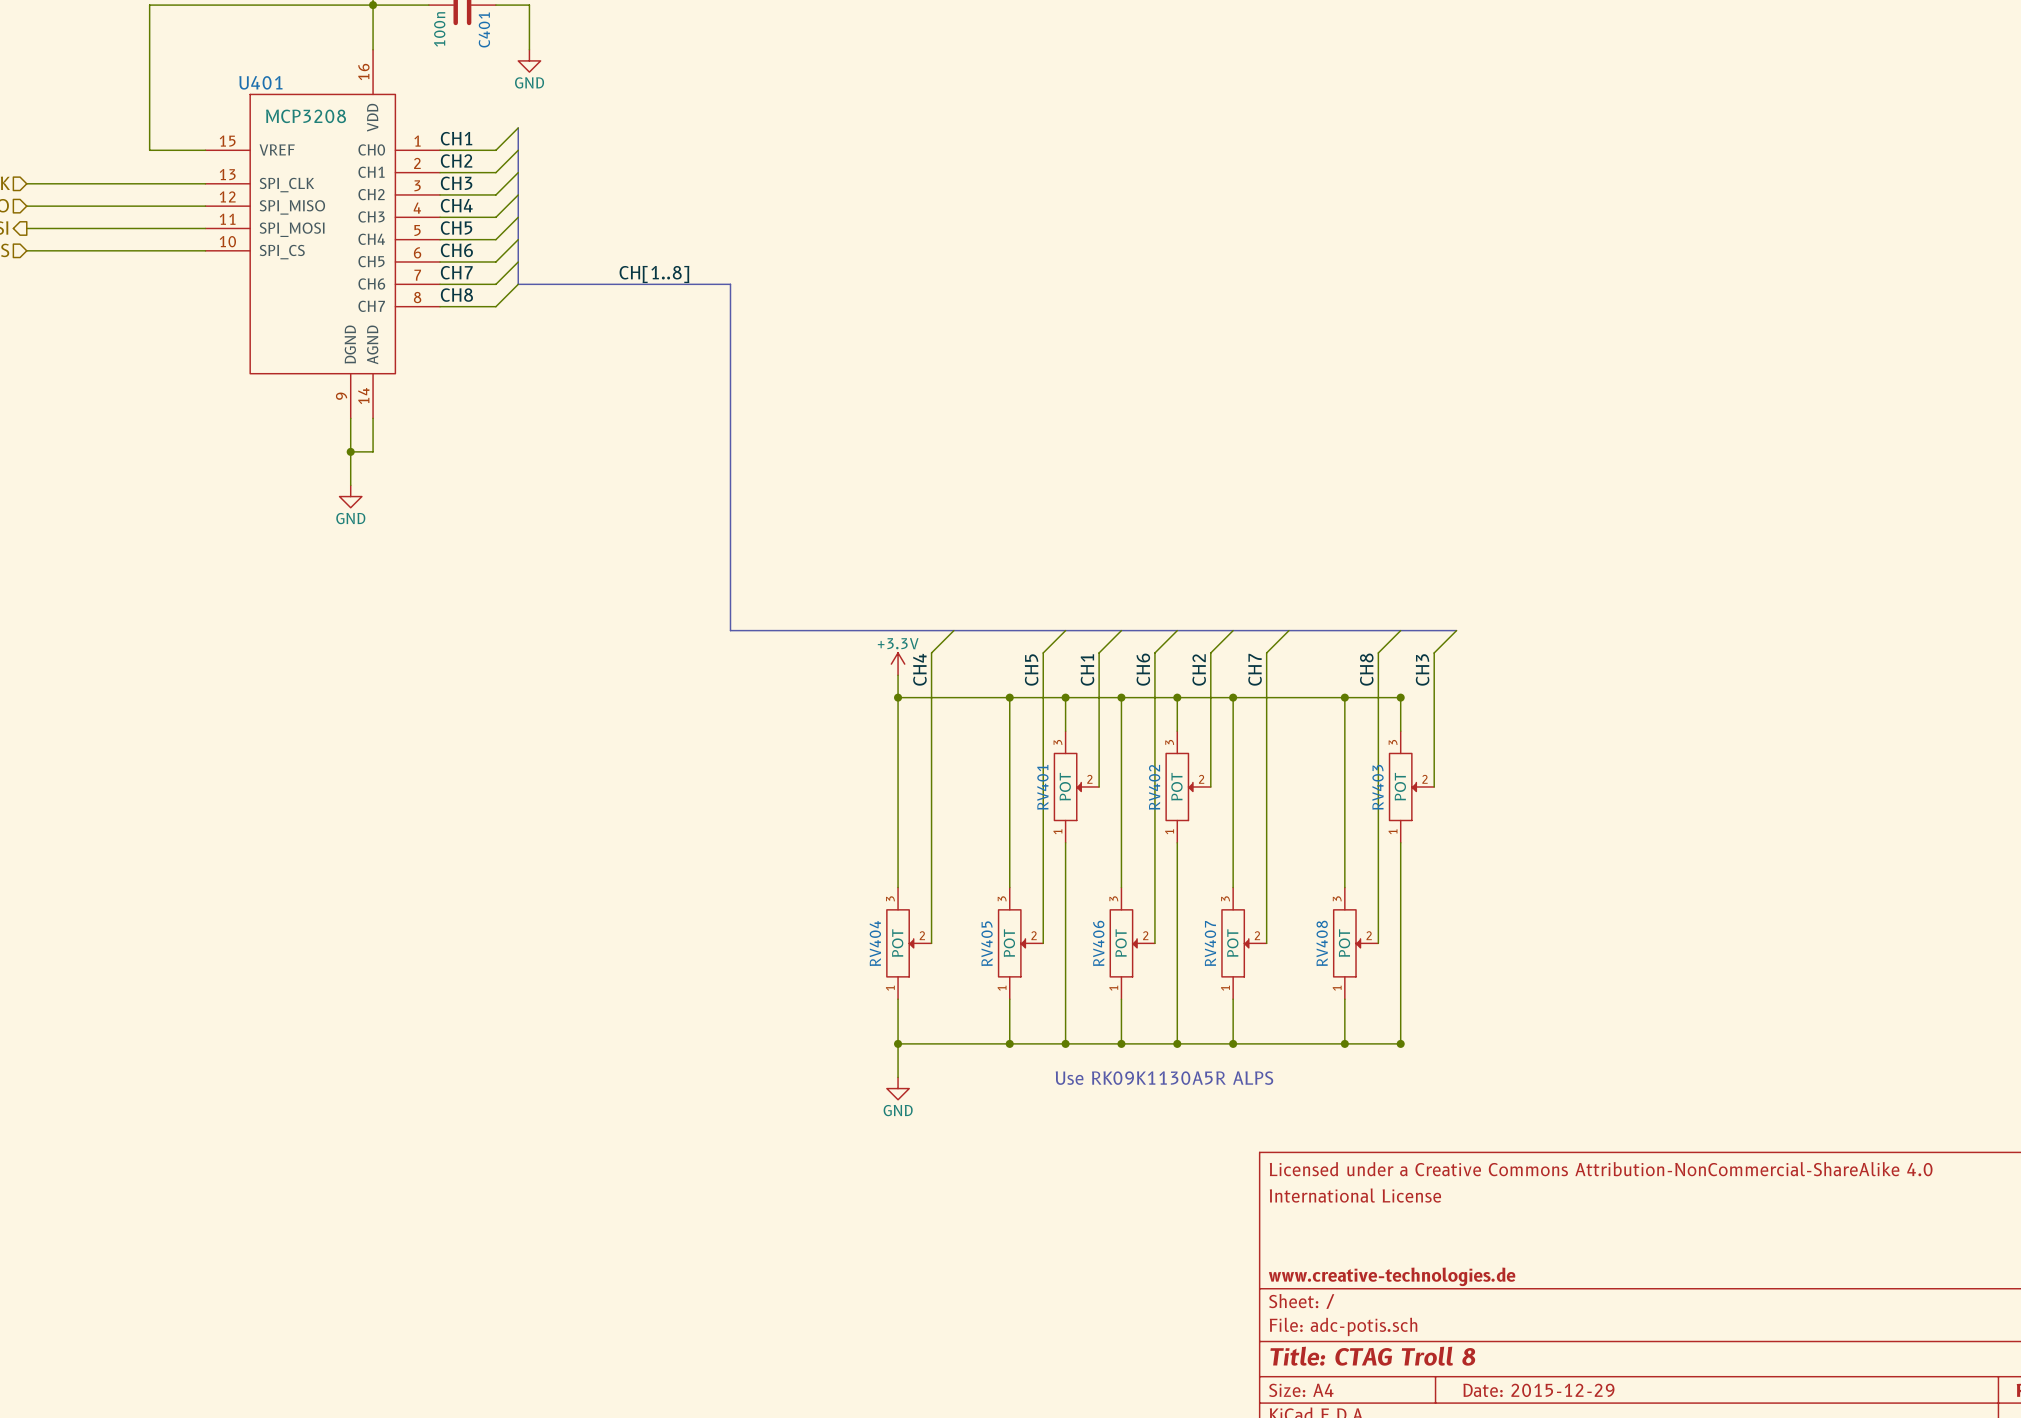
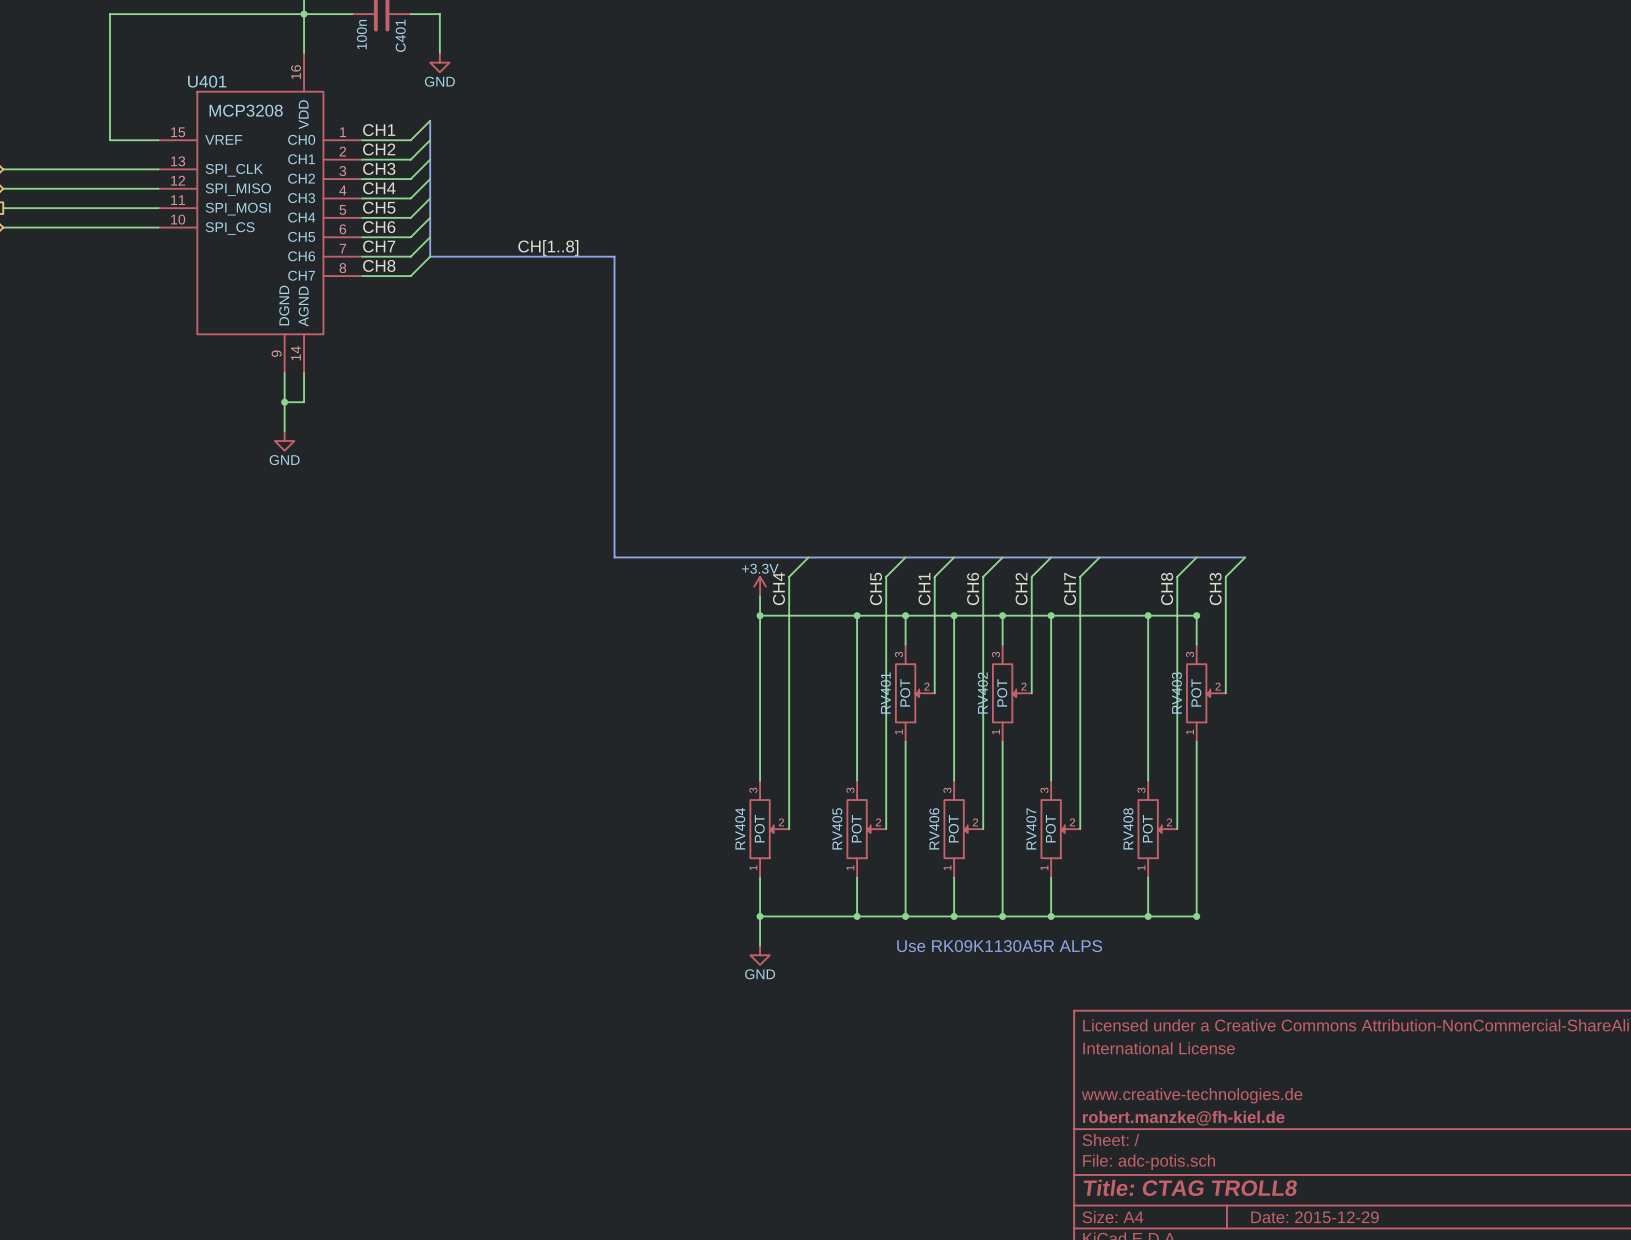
title block: none -> www.creative-technologies.de (1192, 1095)
title block: www.creative-technologies.de (1392, 1276) -> robert.manzke@fh-kiel.de (1183, 1118)
title block: Title: CTAG Troll 8 (1372, 1356) -> Title: CTAG TROLL8 (1190, 1187)

